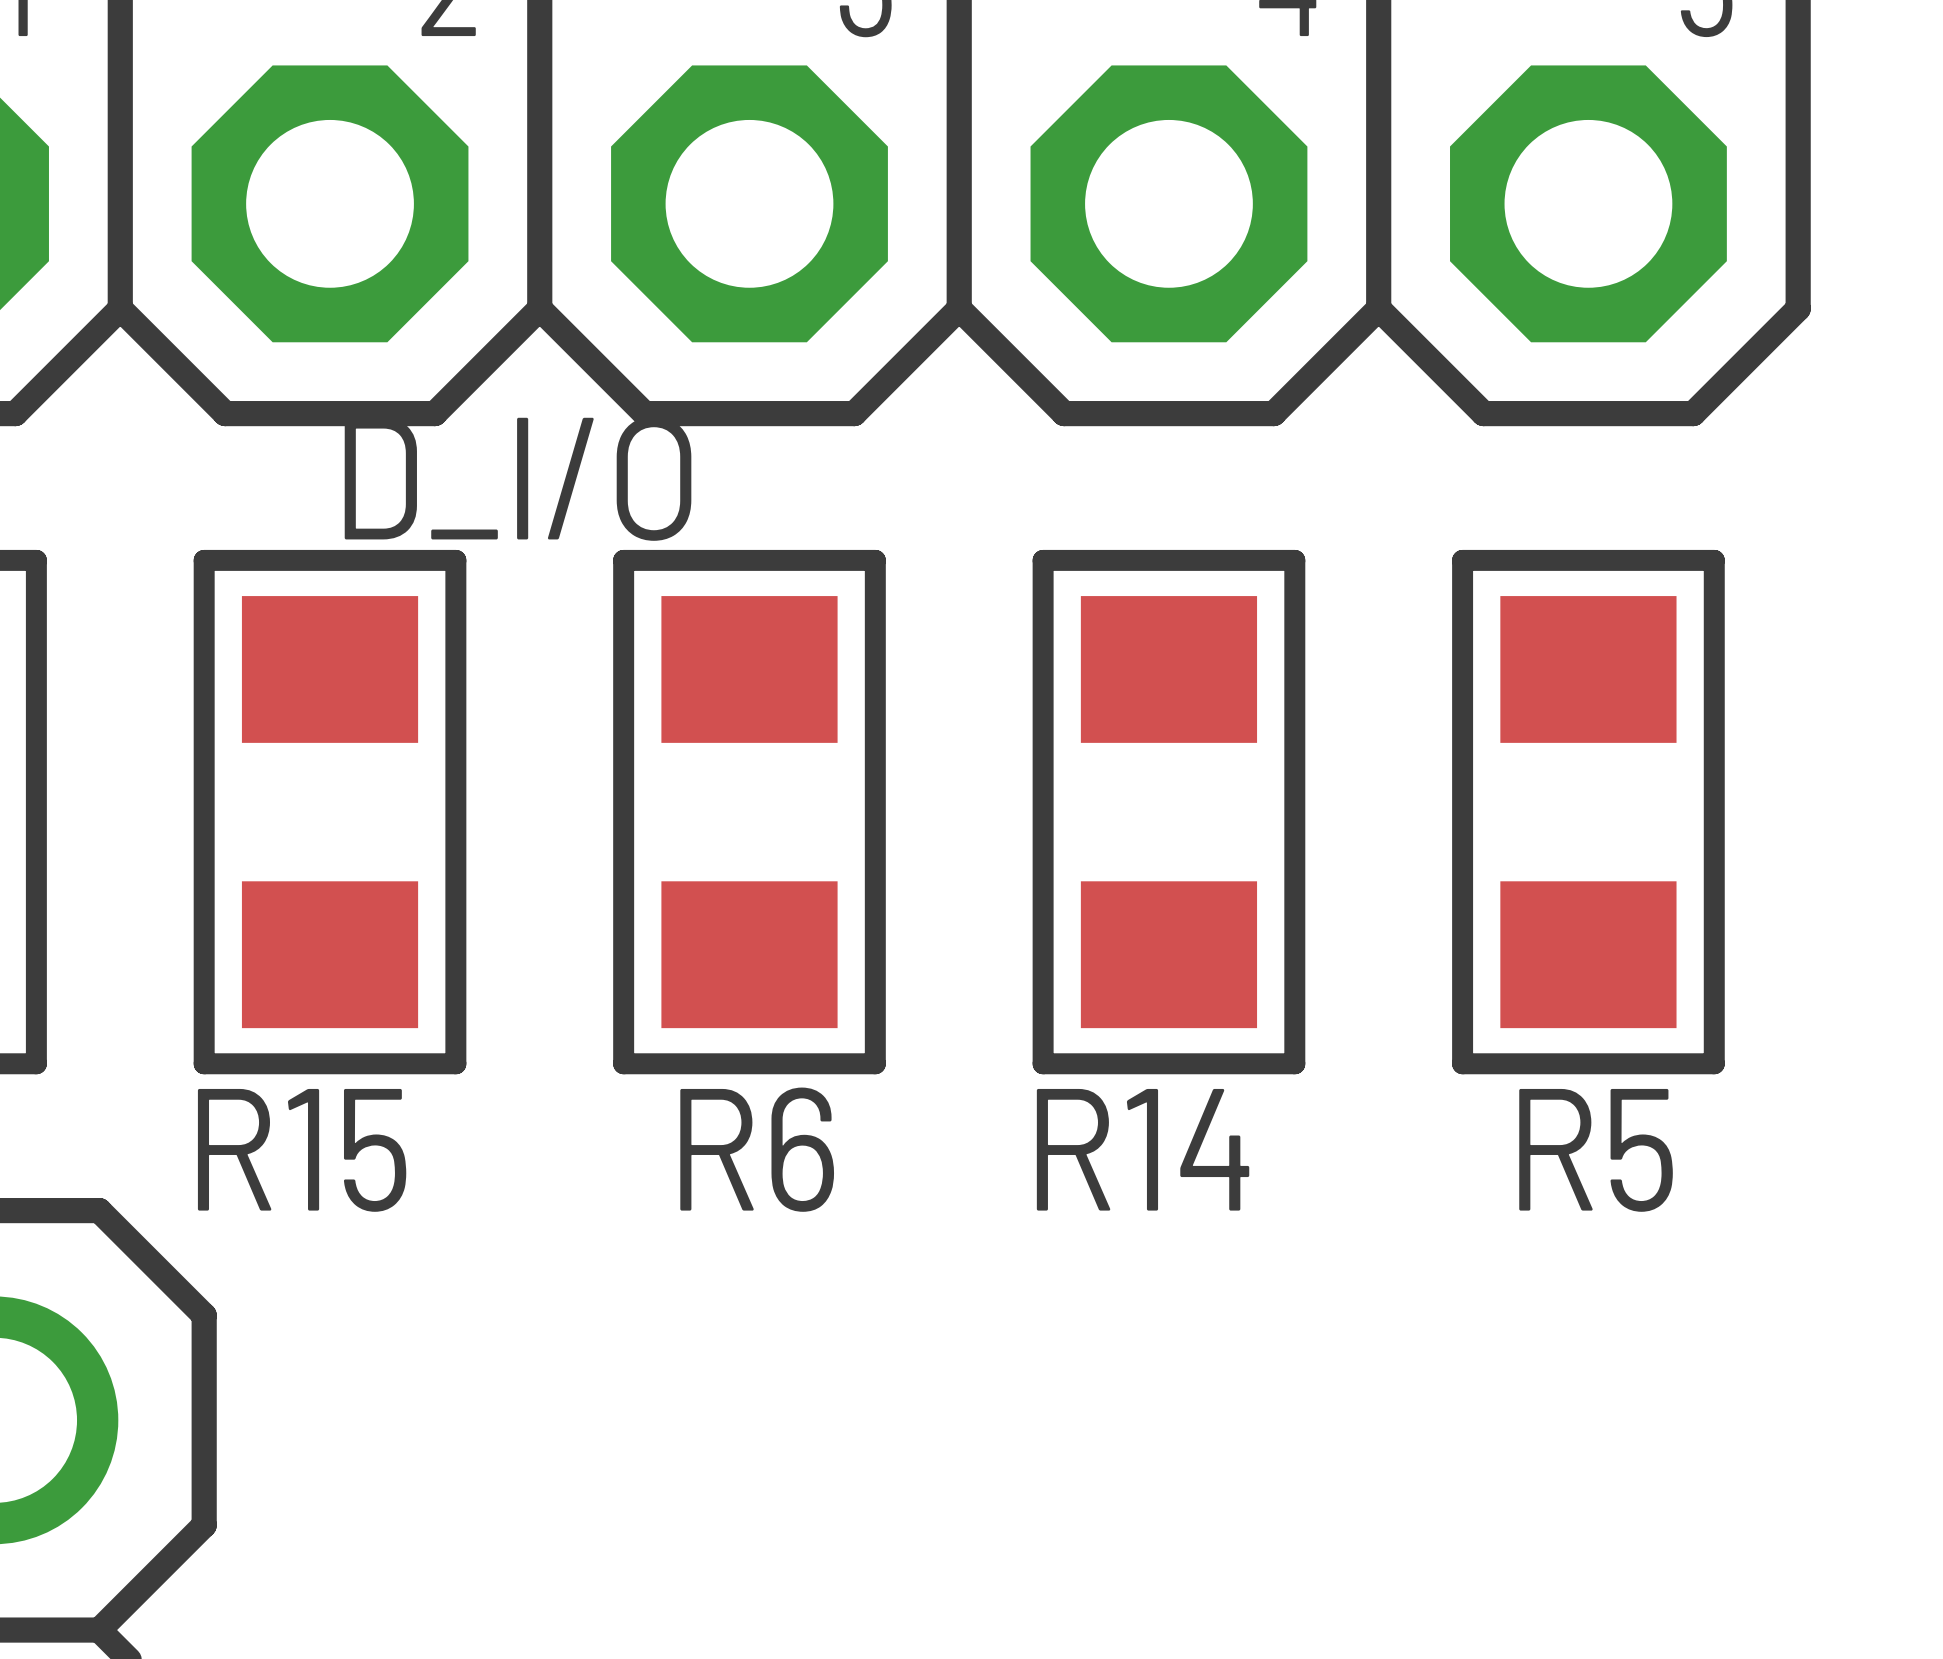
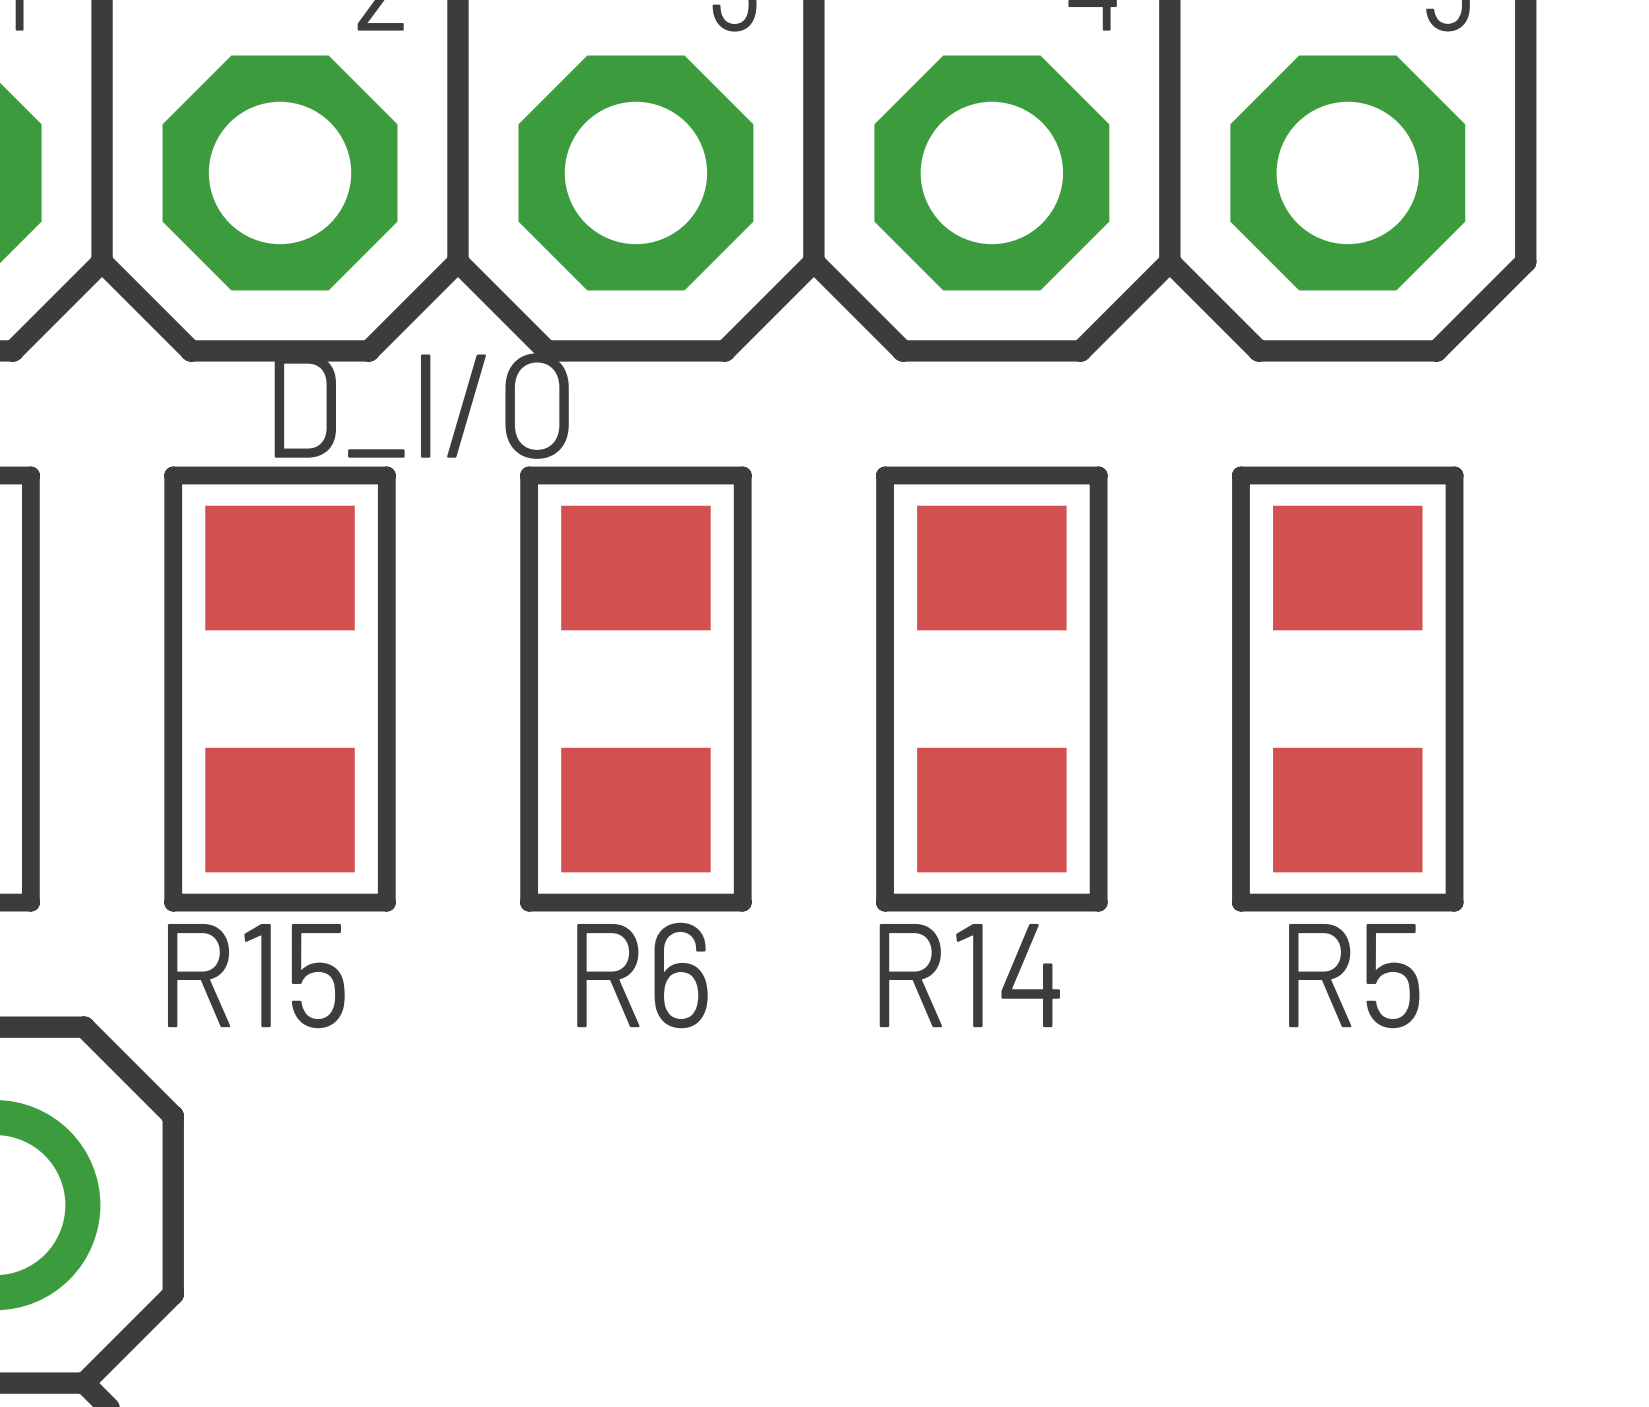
D_I/O name position: D_I/O (518, 478) -> D_I/O (421, 406)

